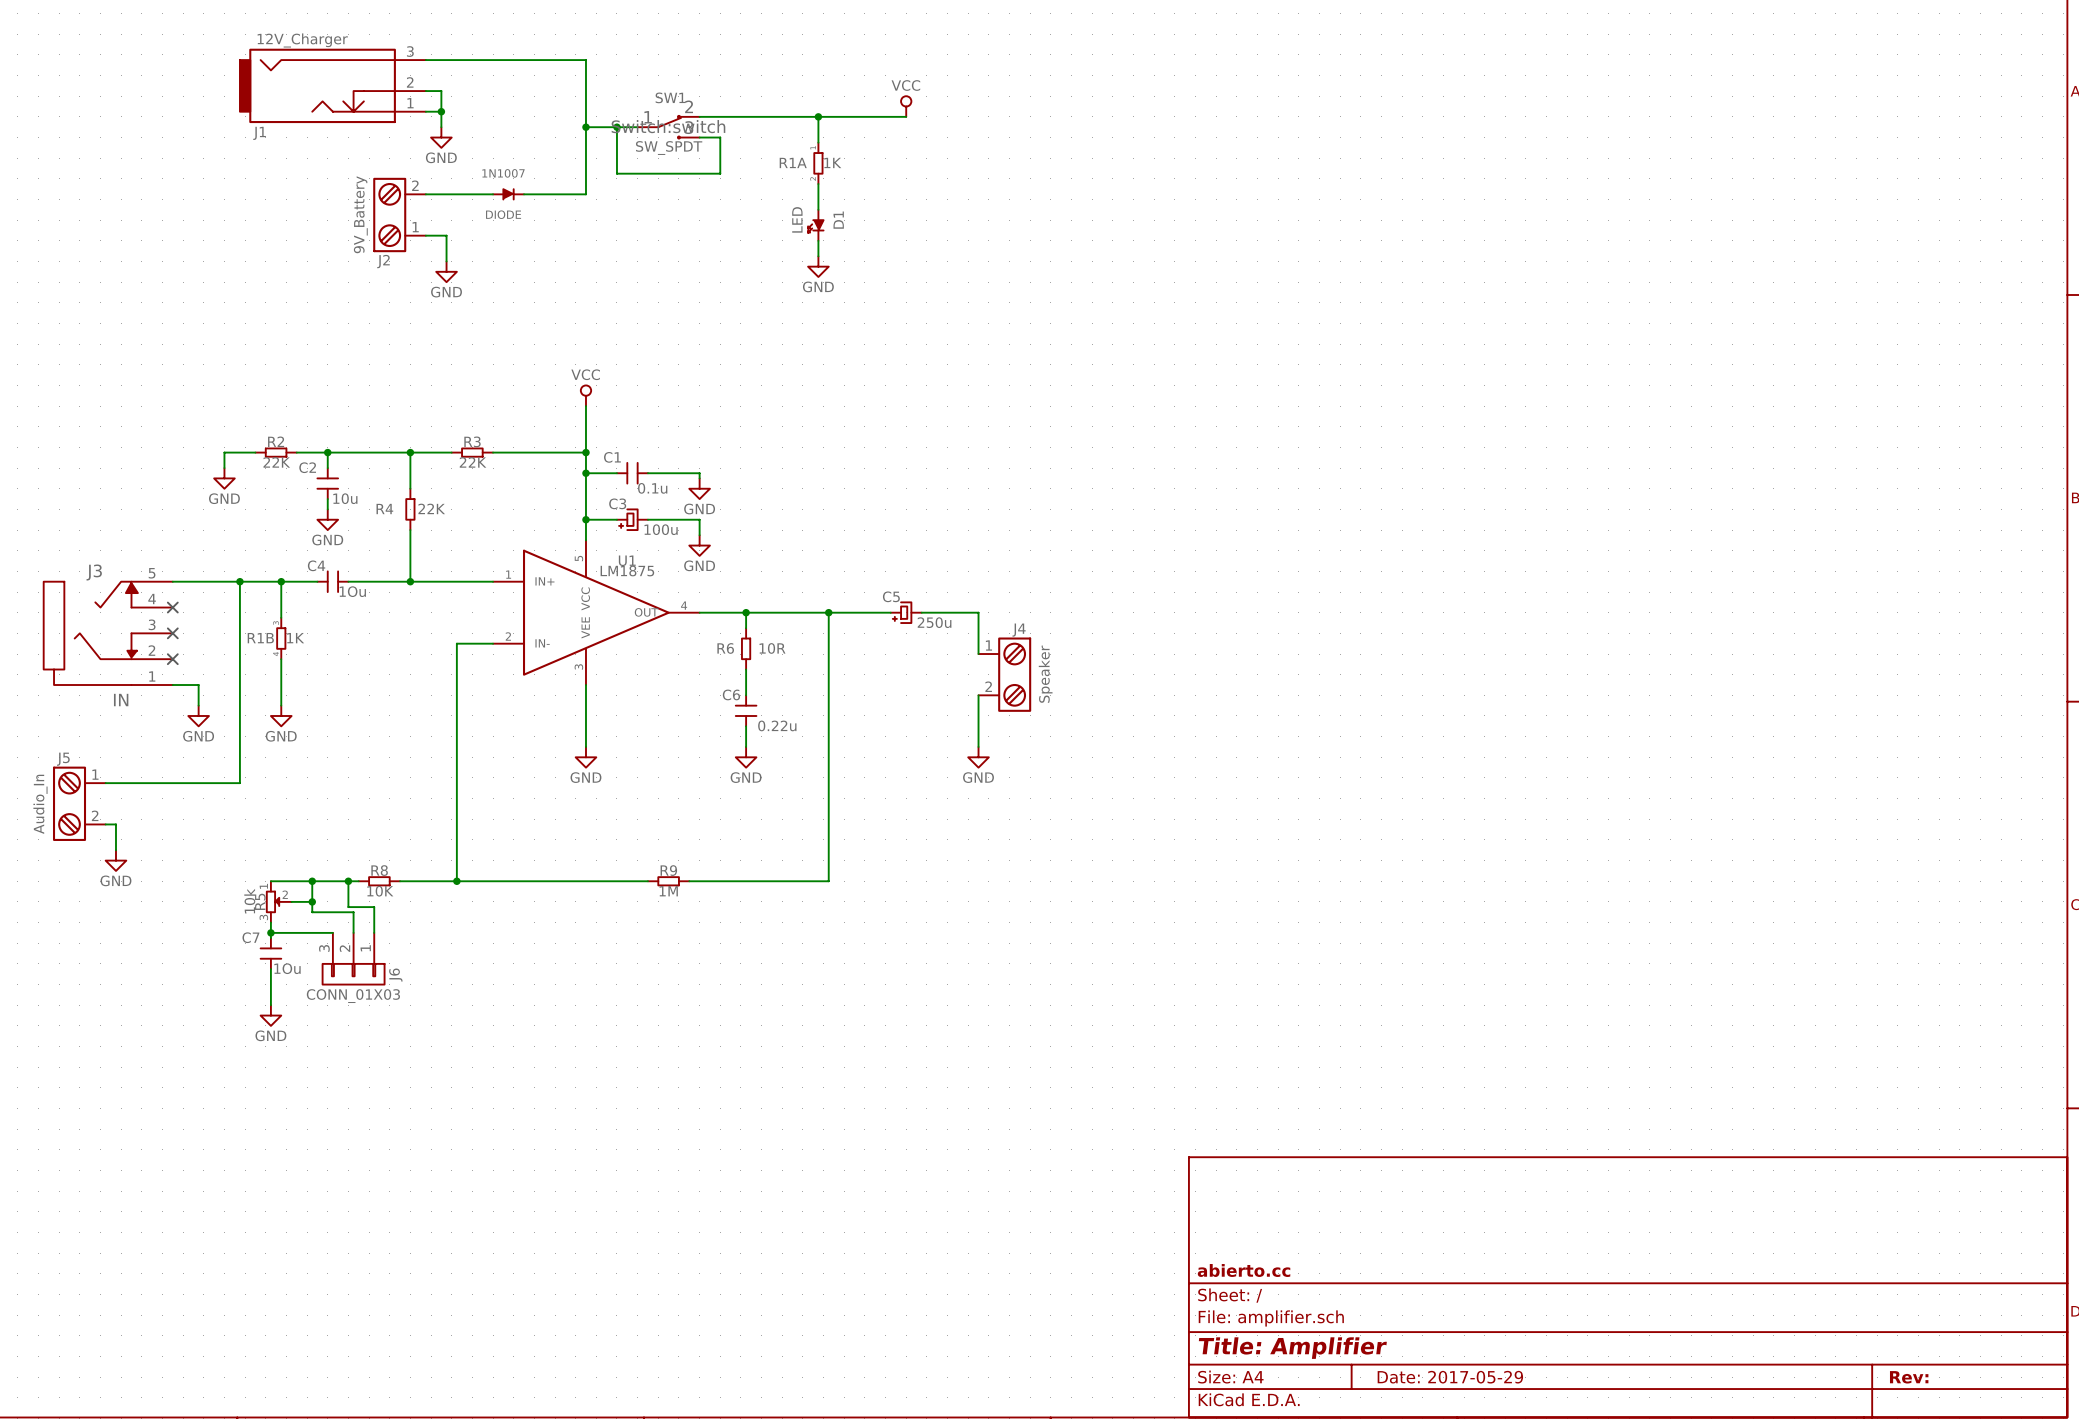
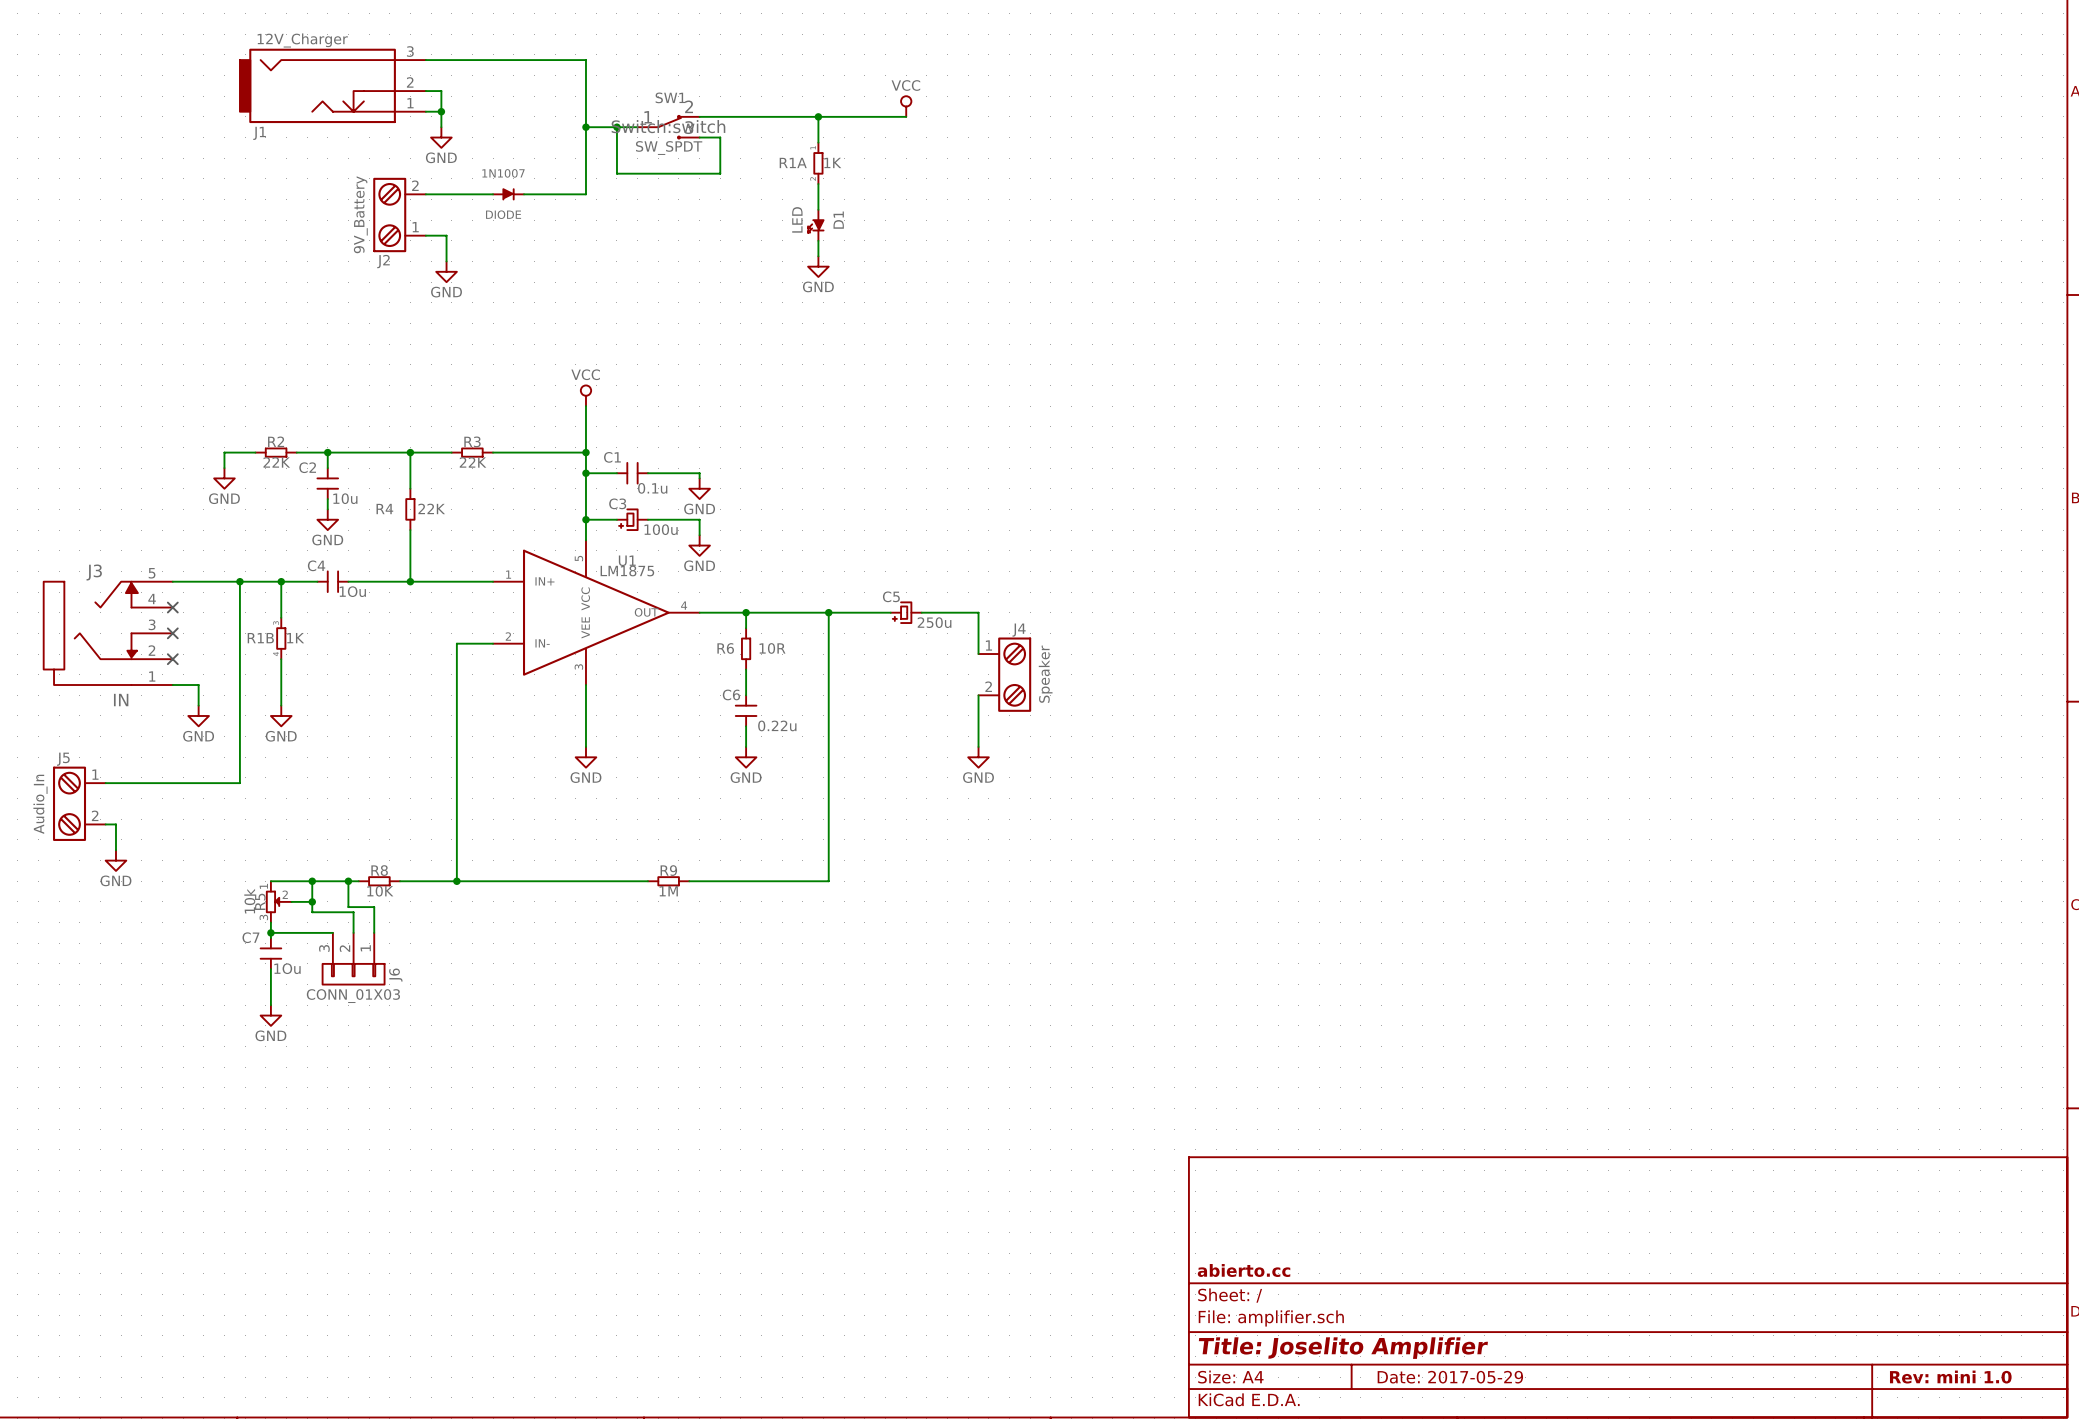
title block: Title: Amplifier (1292, 1348) -> Title: Joselito Amplifier (1343, 1348)
title block: Rev: (1909, 1377) -> Rev: mini 1.0 (1950, 1377)

